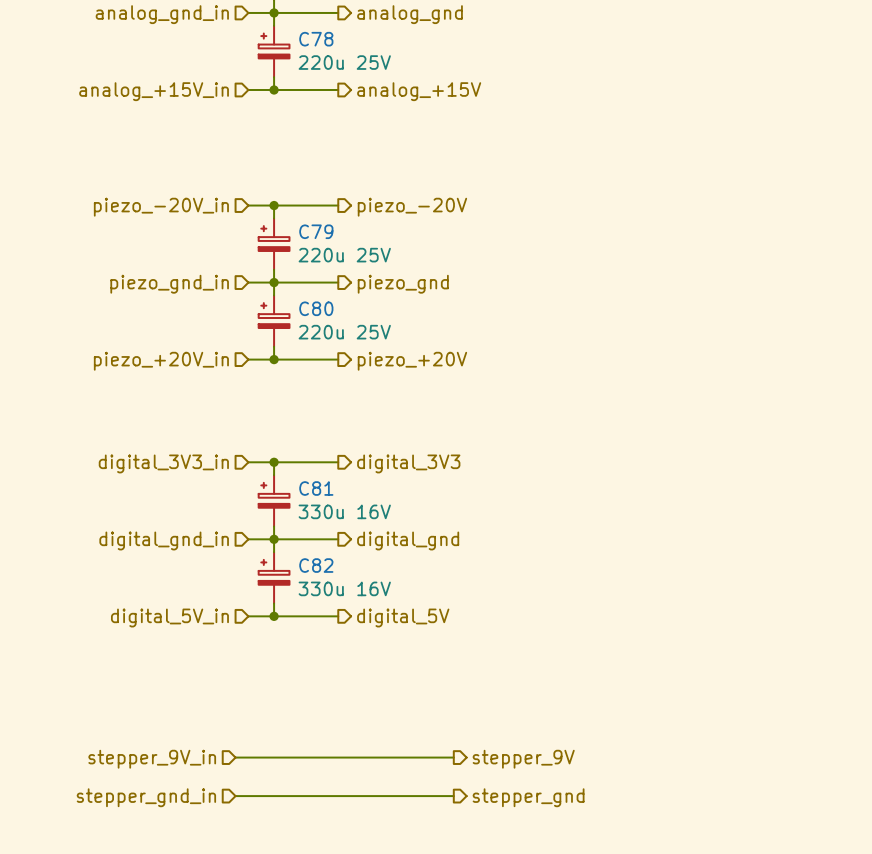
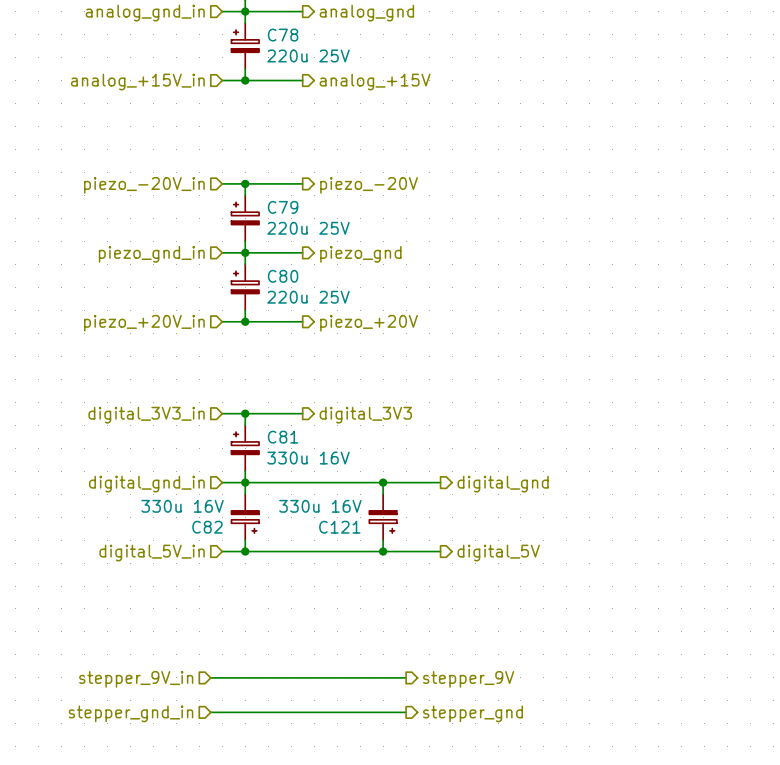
wire: none -> (302, 482) (440, 482)
wire: none -> (383, 482) (383, 494)
junction: none -> (383, 482)
hierarchical label position: digital_gnd (408, 540) -> digital_gnd (503, 484)
C82 rotation: 0° (274, 572) -> 180° (245, 522)
C121: none -> 330u 16V (383, 517)
wire: none -> (383, 540) (383, 551)
wire: none -> (302, 551) (440, 551)
junction: none -> (383, 551)
hierarchical label position: digital_5V (403, 618) -> digital_5V (498, 553)

